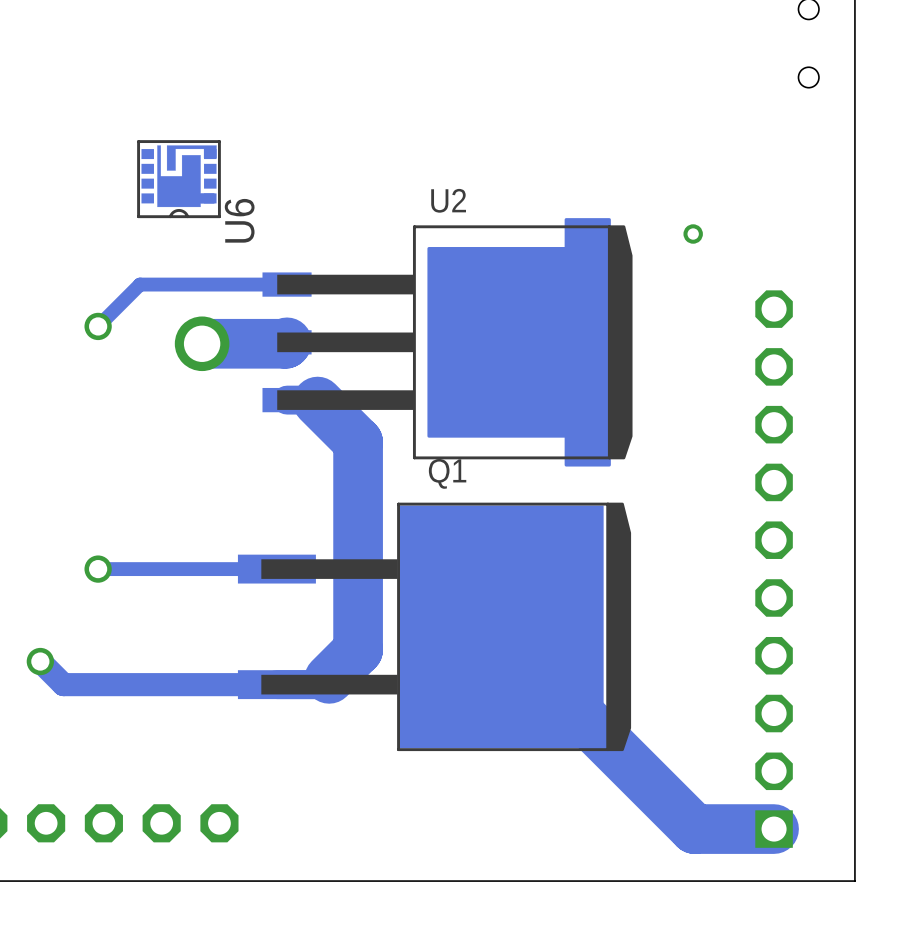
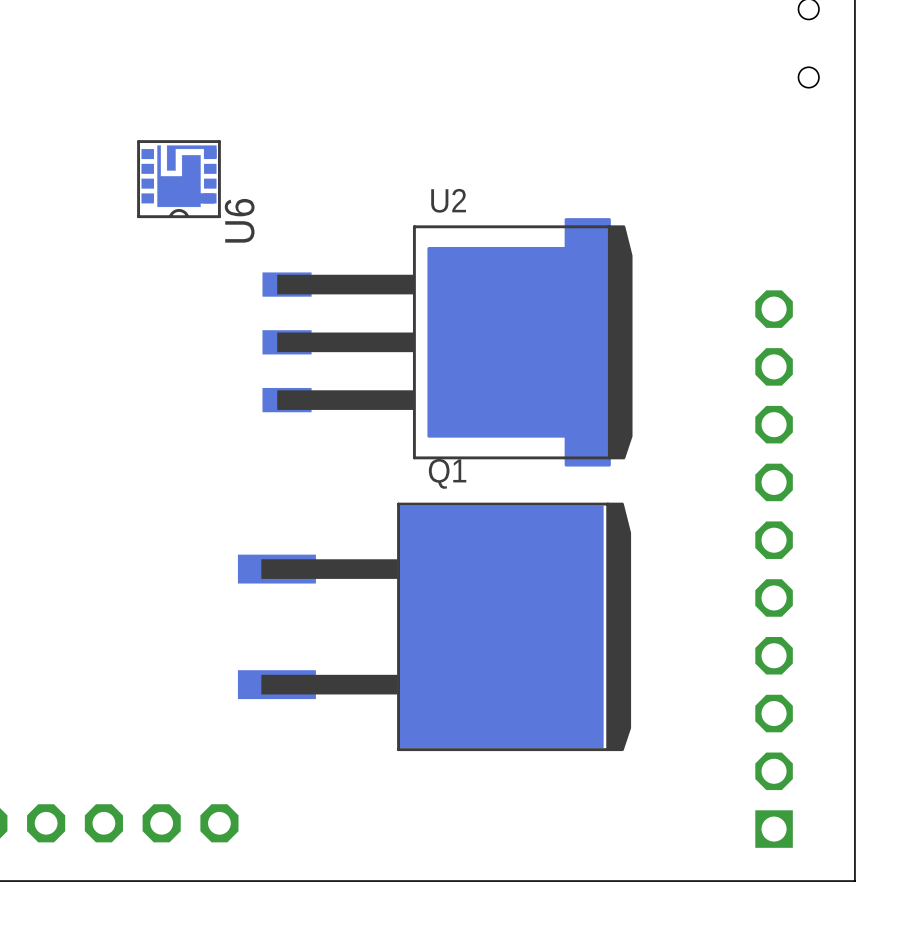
via: (693, 234) -> none
track: (287, 284) (140, 284) (98, 326) -> none
via: (98, 326) -> none
track: (287, 342) (202, 343) -> none
via: (202, 343) -> none
track: (287, 400) (316, 400) (358, 441) (358, 649) (323, 684) (63, 684) (40, 661) -> none
via: (98, 569) -> none
track: (276, 569) (98, 569) -> none
track: (492, 626) (694, 829) (774, 829) -> none
via: (40, 661) -> none

